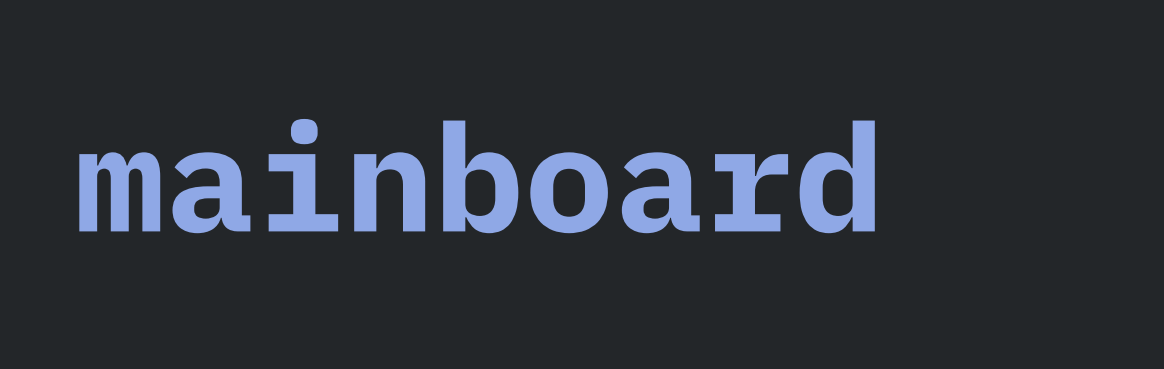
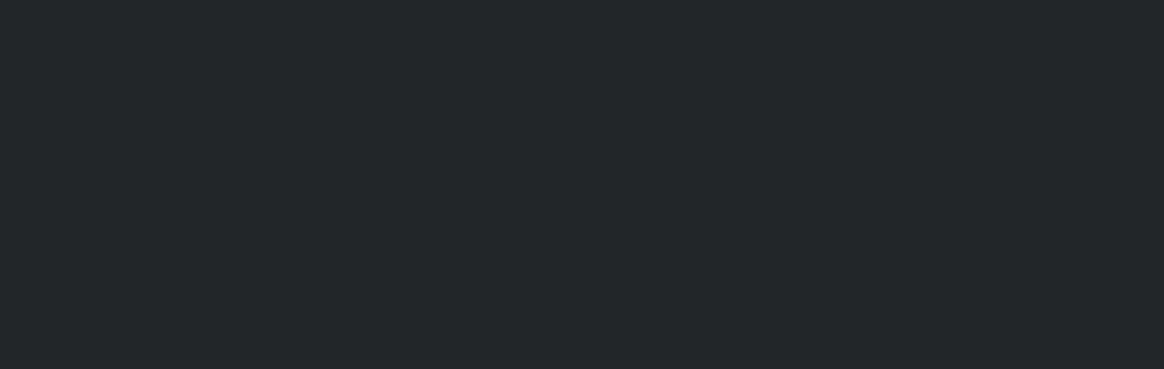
text: mainboard (477, 176) -> none

